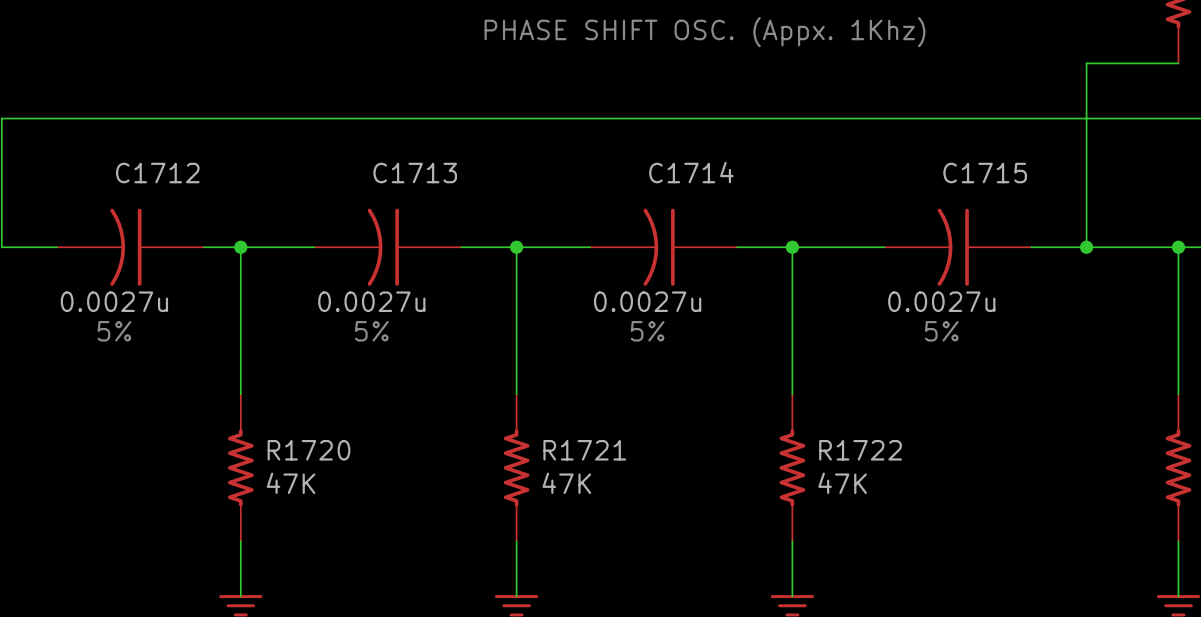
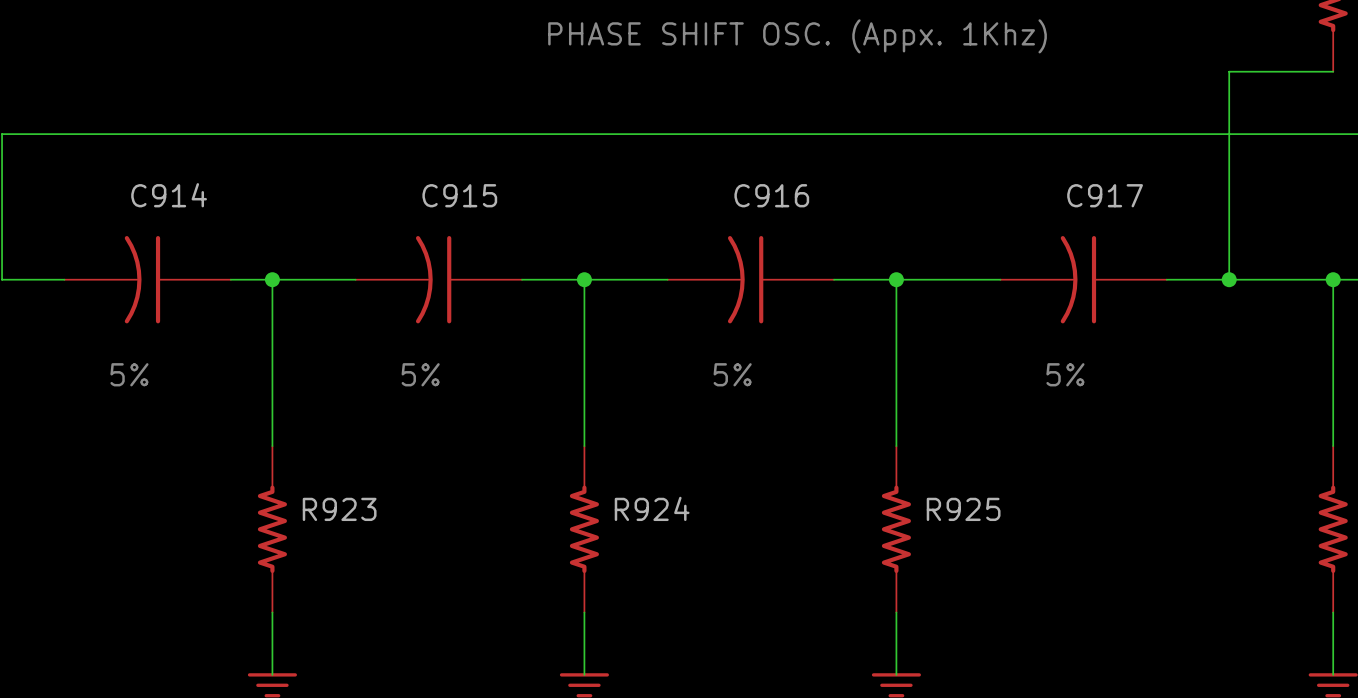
C1714 name: C1714 (691, 172) -> C916 (771, 195)
C1712 name: C1712 (157, 173) -> C914 (169, 195)
C1713 name: C1713 (415, 173) -> C915 (459, 195)
C1715 name: C1715 (985, 173) -> C917 (1105, 195)
C1712 value: 0.0027u (114, 301) -> none
C1713 value: 0.0027u (371, 301) -> none
C1714 value: 0.0027u (647, 301) -> none
C1715 value: 0.0027u (941, 301) -> none
R1720 name: R1720 (308, 450) -> R923 (339, 509)
R1721 name: R1721 (584, 450) -> R924 (652, 508)
R1722 name: R1722 (860, 450) -> R925 (963, 509)
R1720 value: 47K (291, 483) -> none
R1721 value: 47K (566, 483) -> none
R1722 value: 47K (842, 483) -> none

